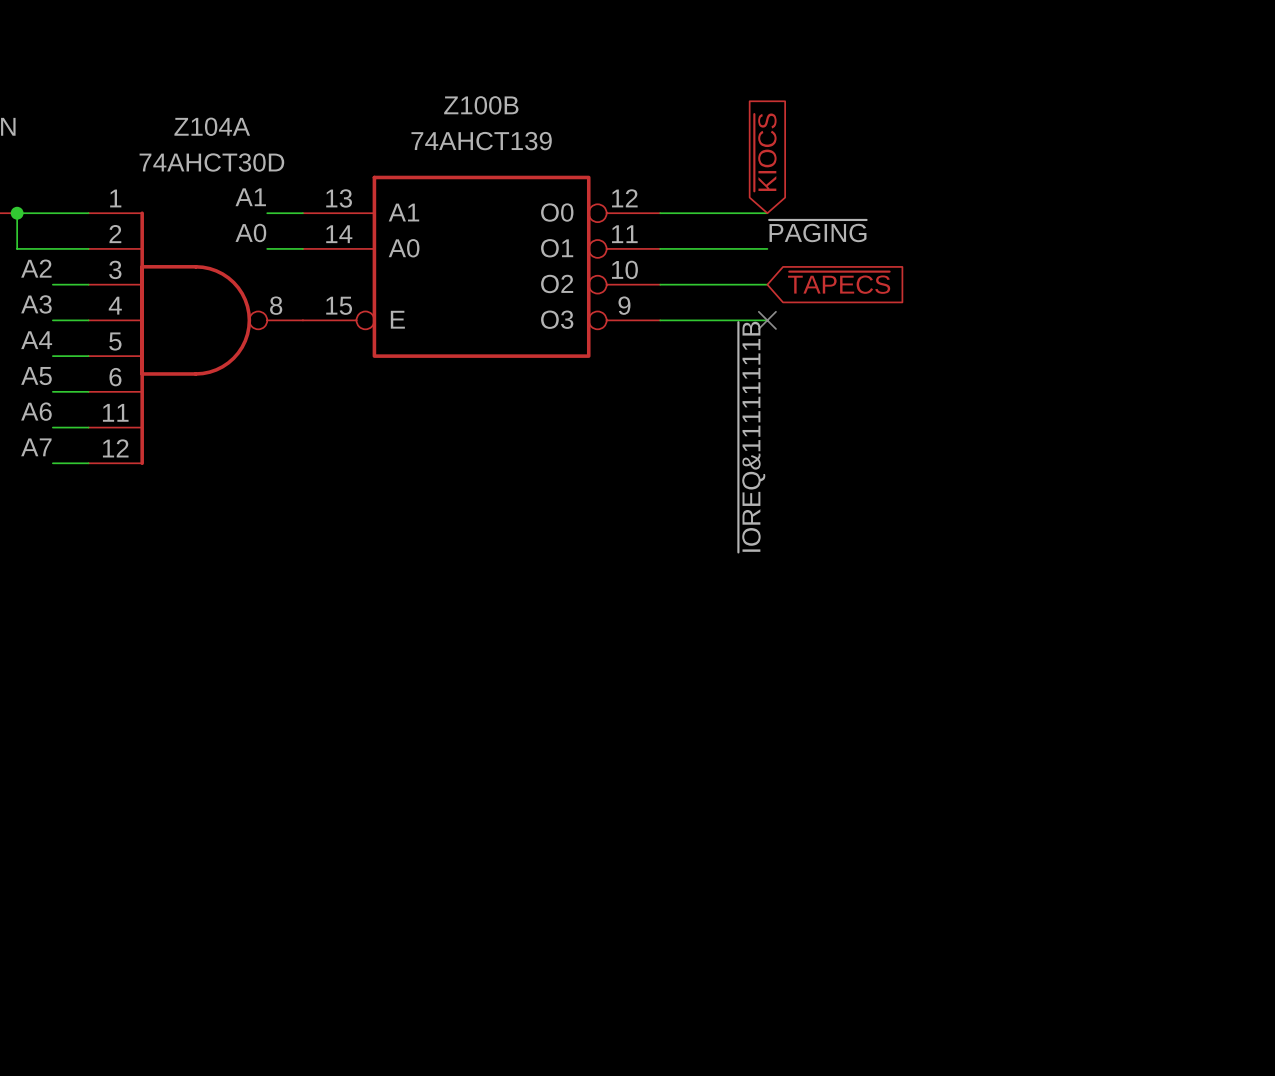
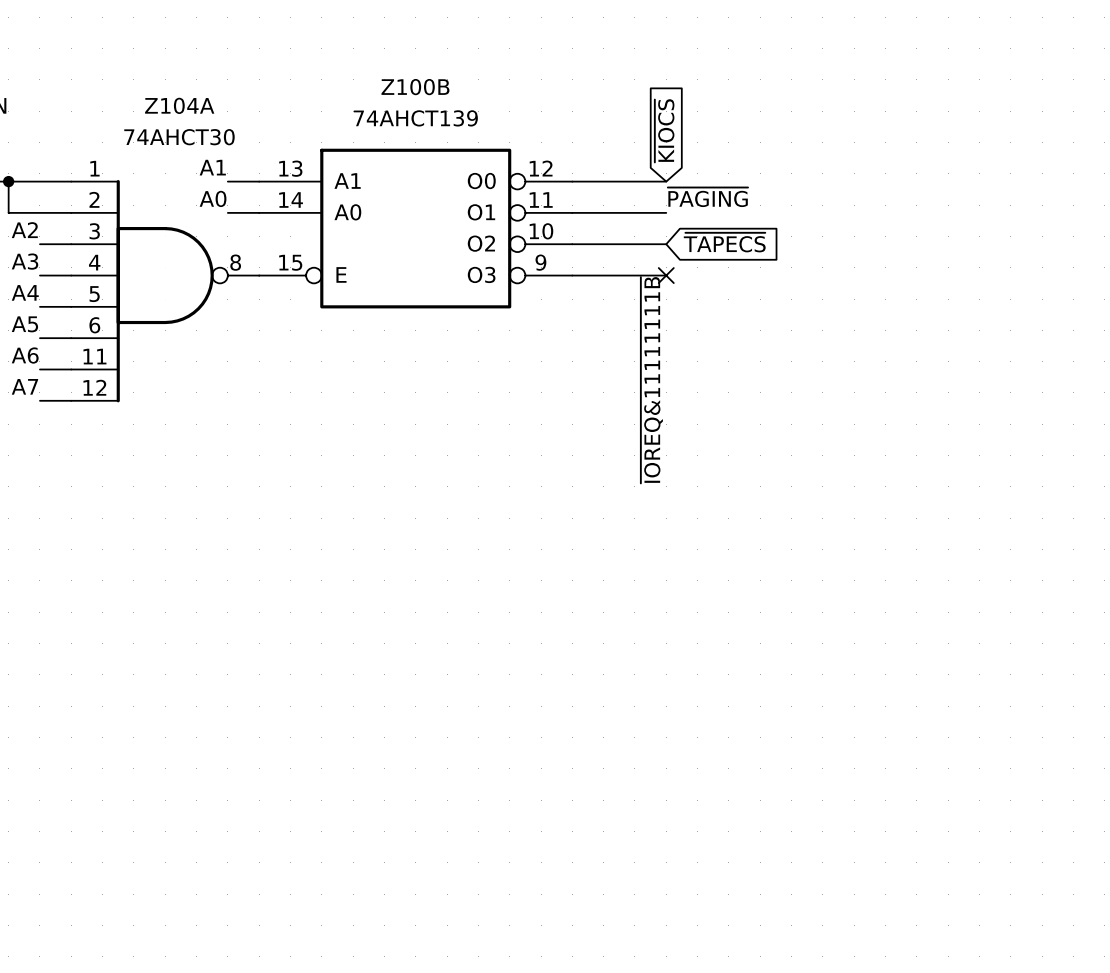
Z104A value: 74AHCT30D (211, 162) -> 74AHCT30 (179, 137)

